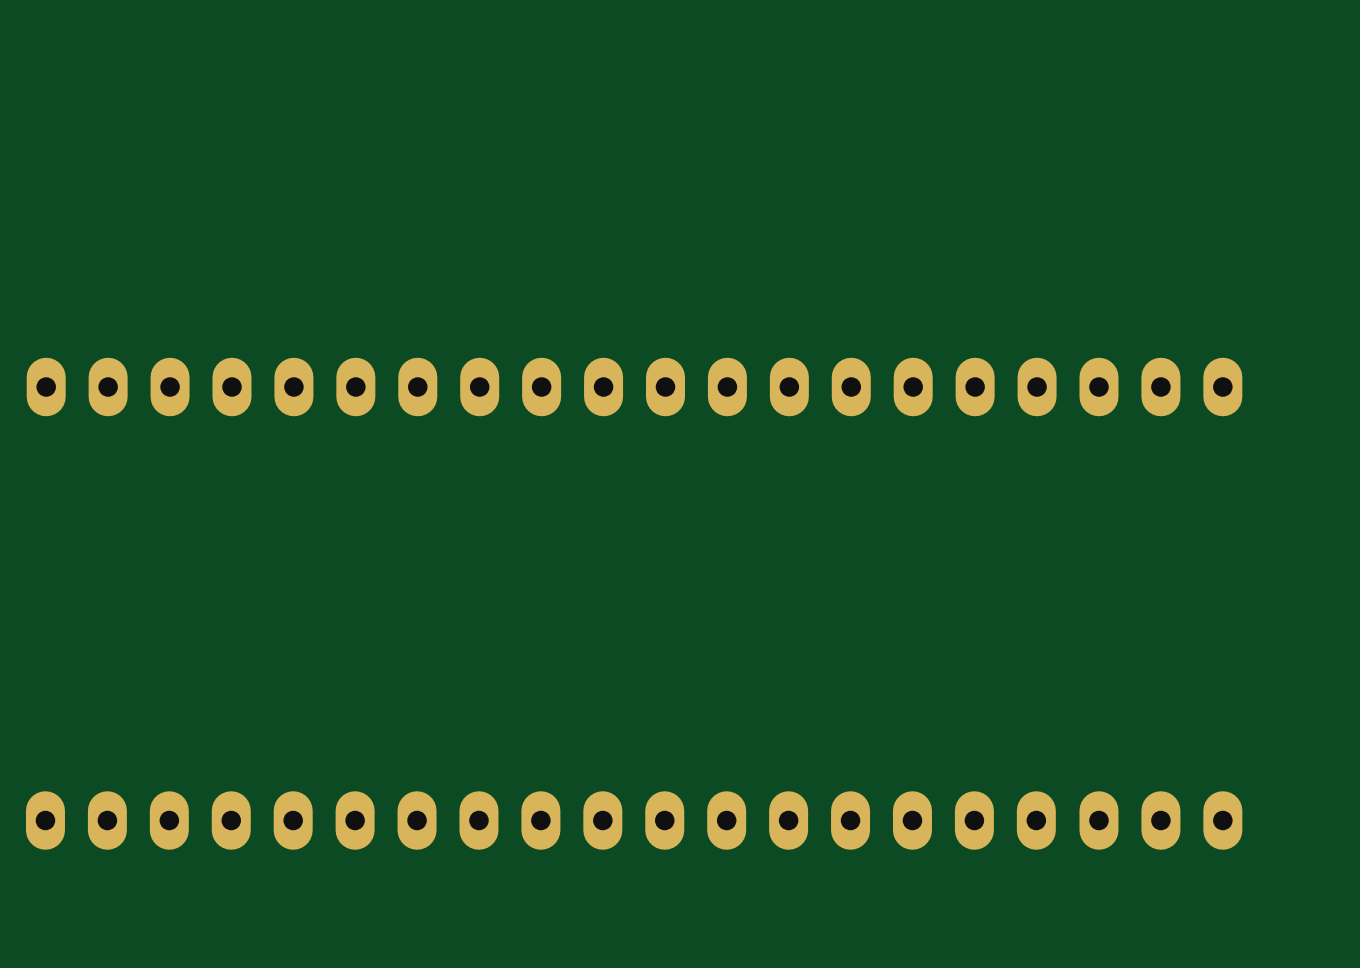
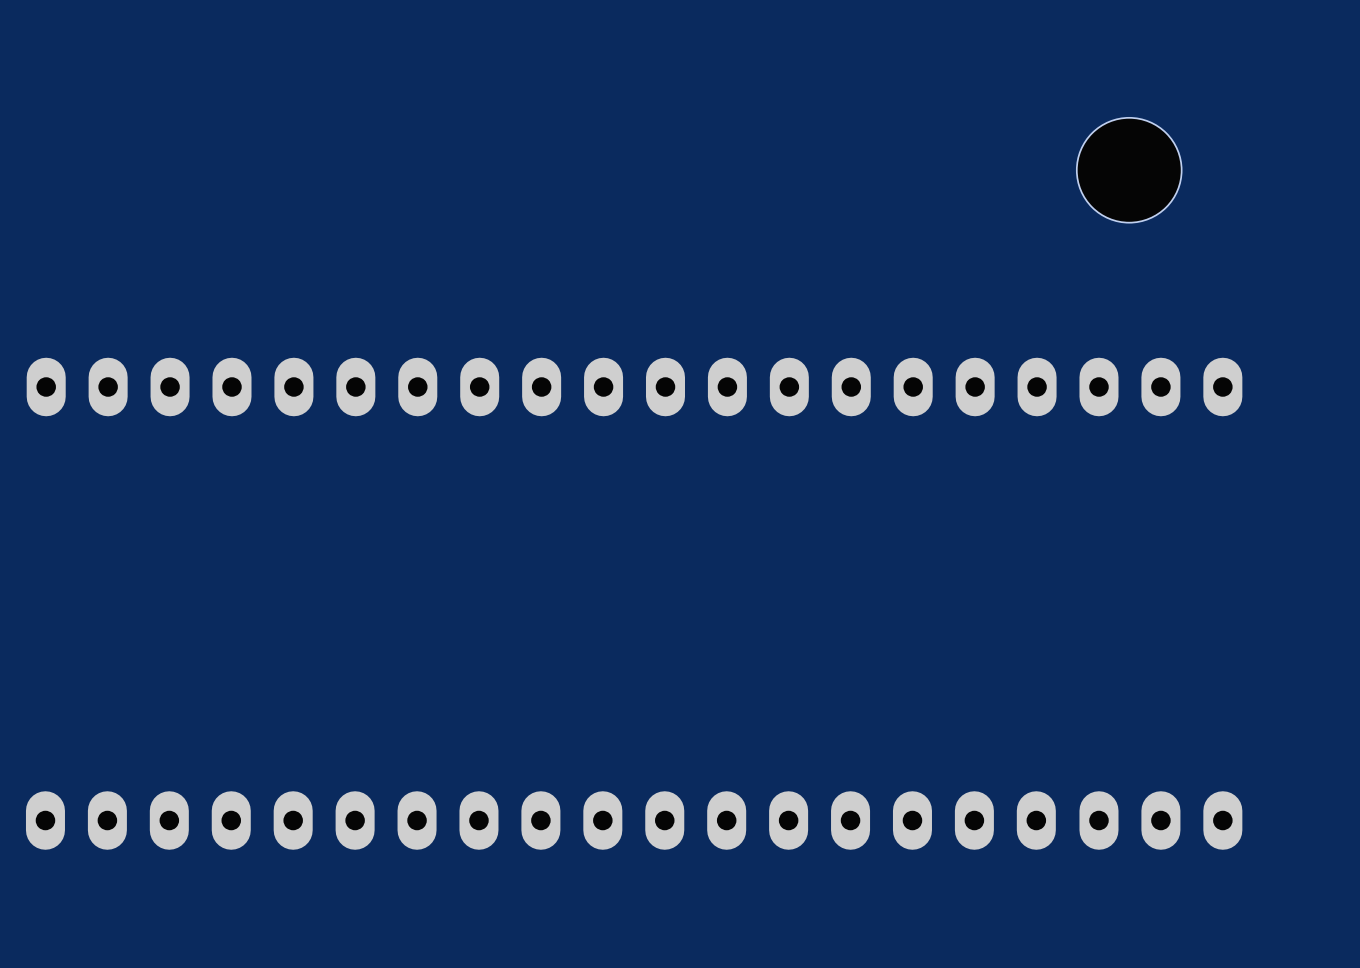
part: none -> (1129, 170)

